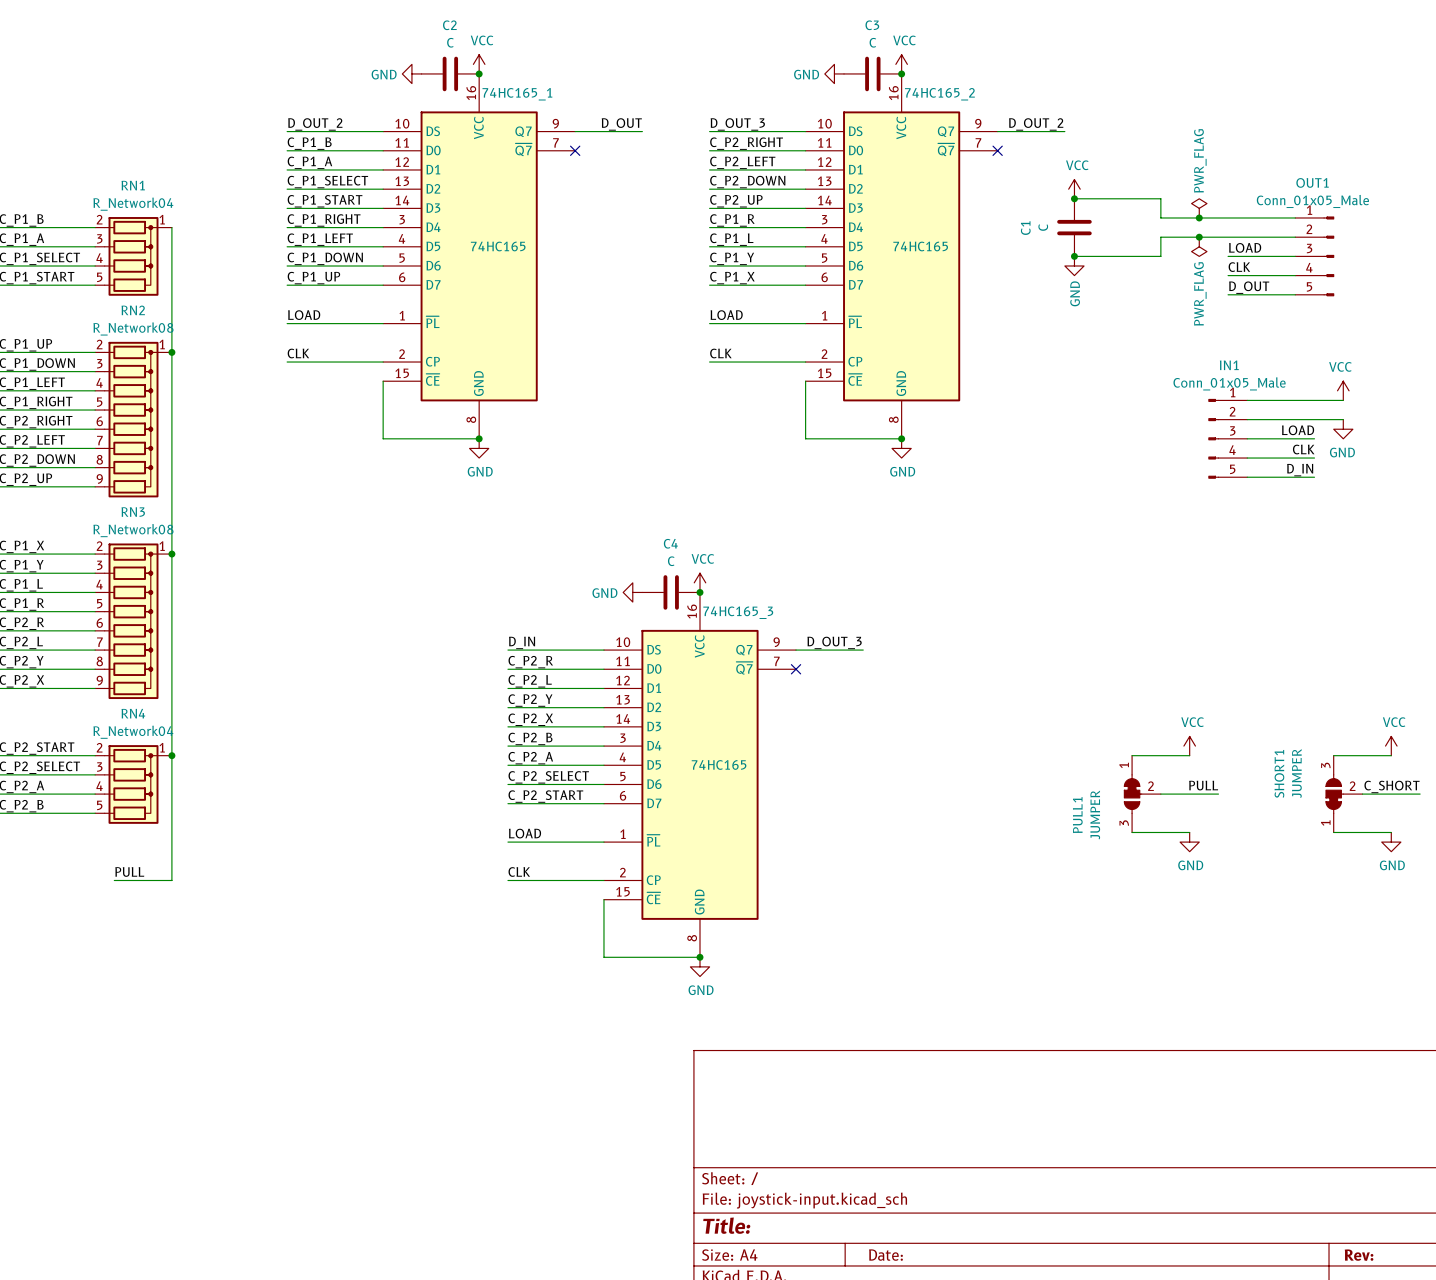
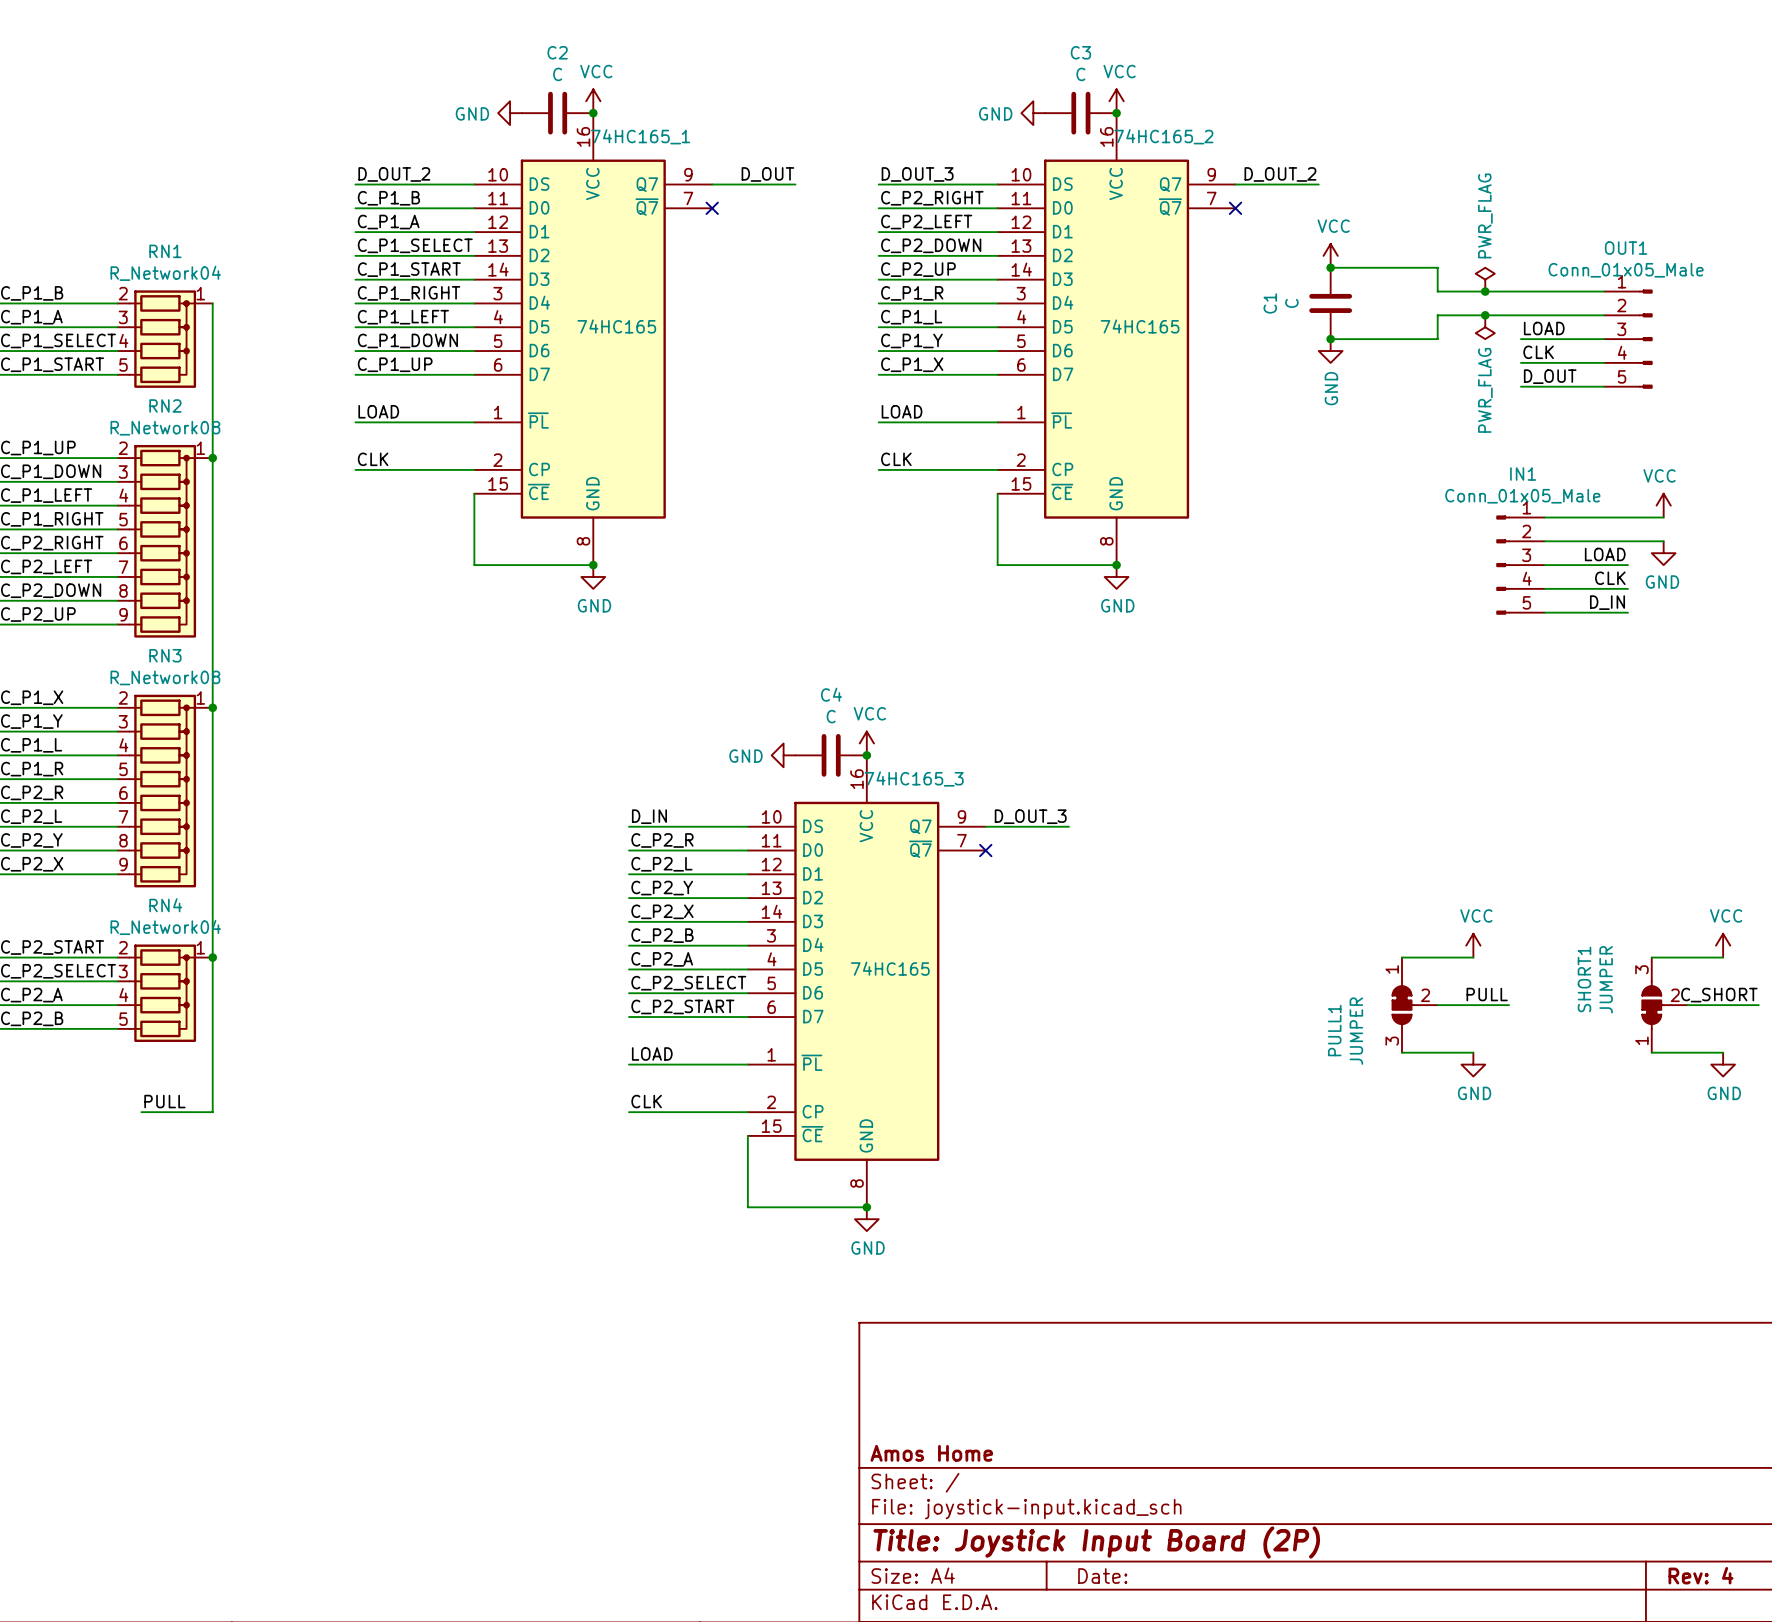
title block: none -> Amos Home (931, 1453)
title block: Title: (726, 1225) -> Title: Joystick Input Board (2P) (1096, 1542)
title block: Rev: (1359, 1255) -> Rev: 4 (1700, 1575)

